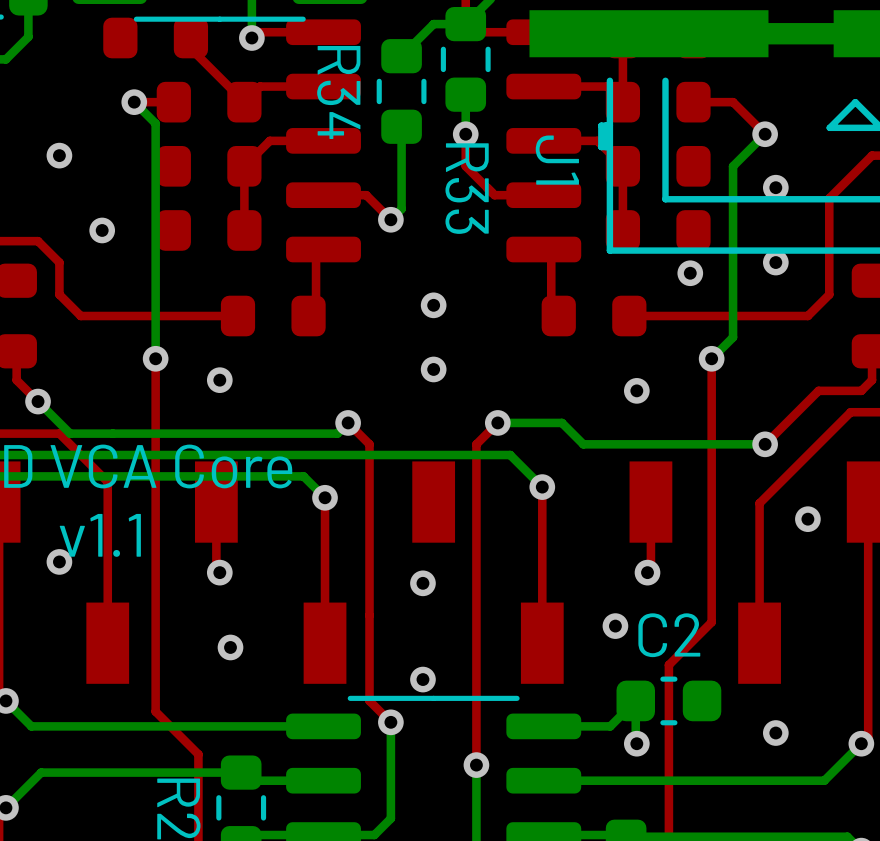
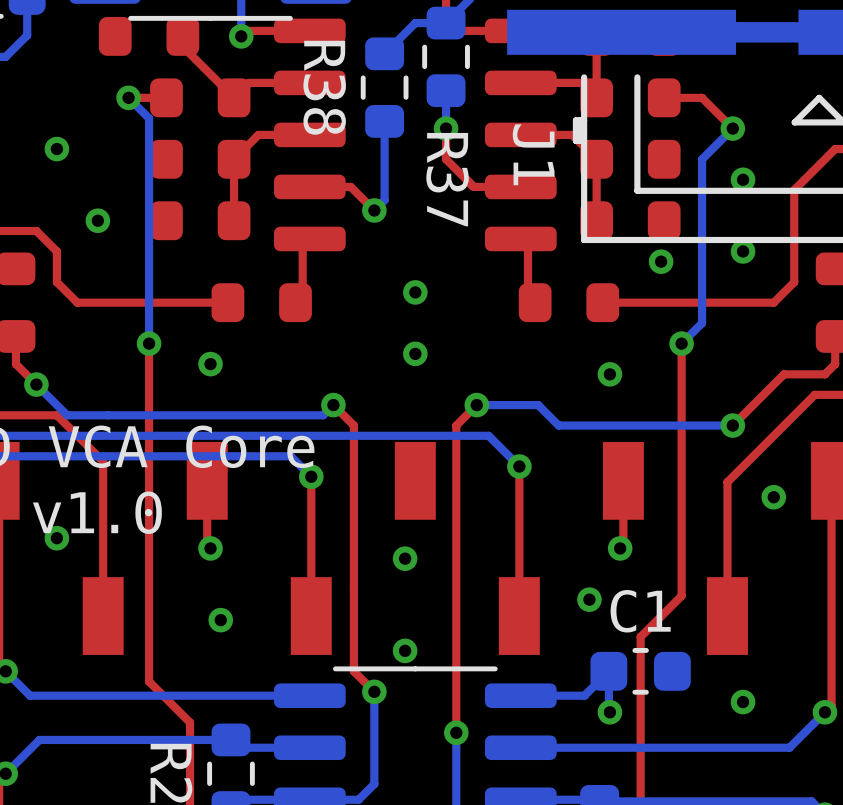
R34 name: R34 (338, 92) -> R38 (324, 87)
R33 name: R33 (467, 188) -> R37 (447, 179)
text: v1.1 (100, 535) -> v1.0 (97, 512)
C2 name: C2 (669, 635) -> C1 (640, 611)

